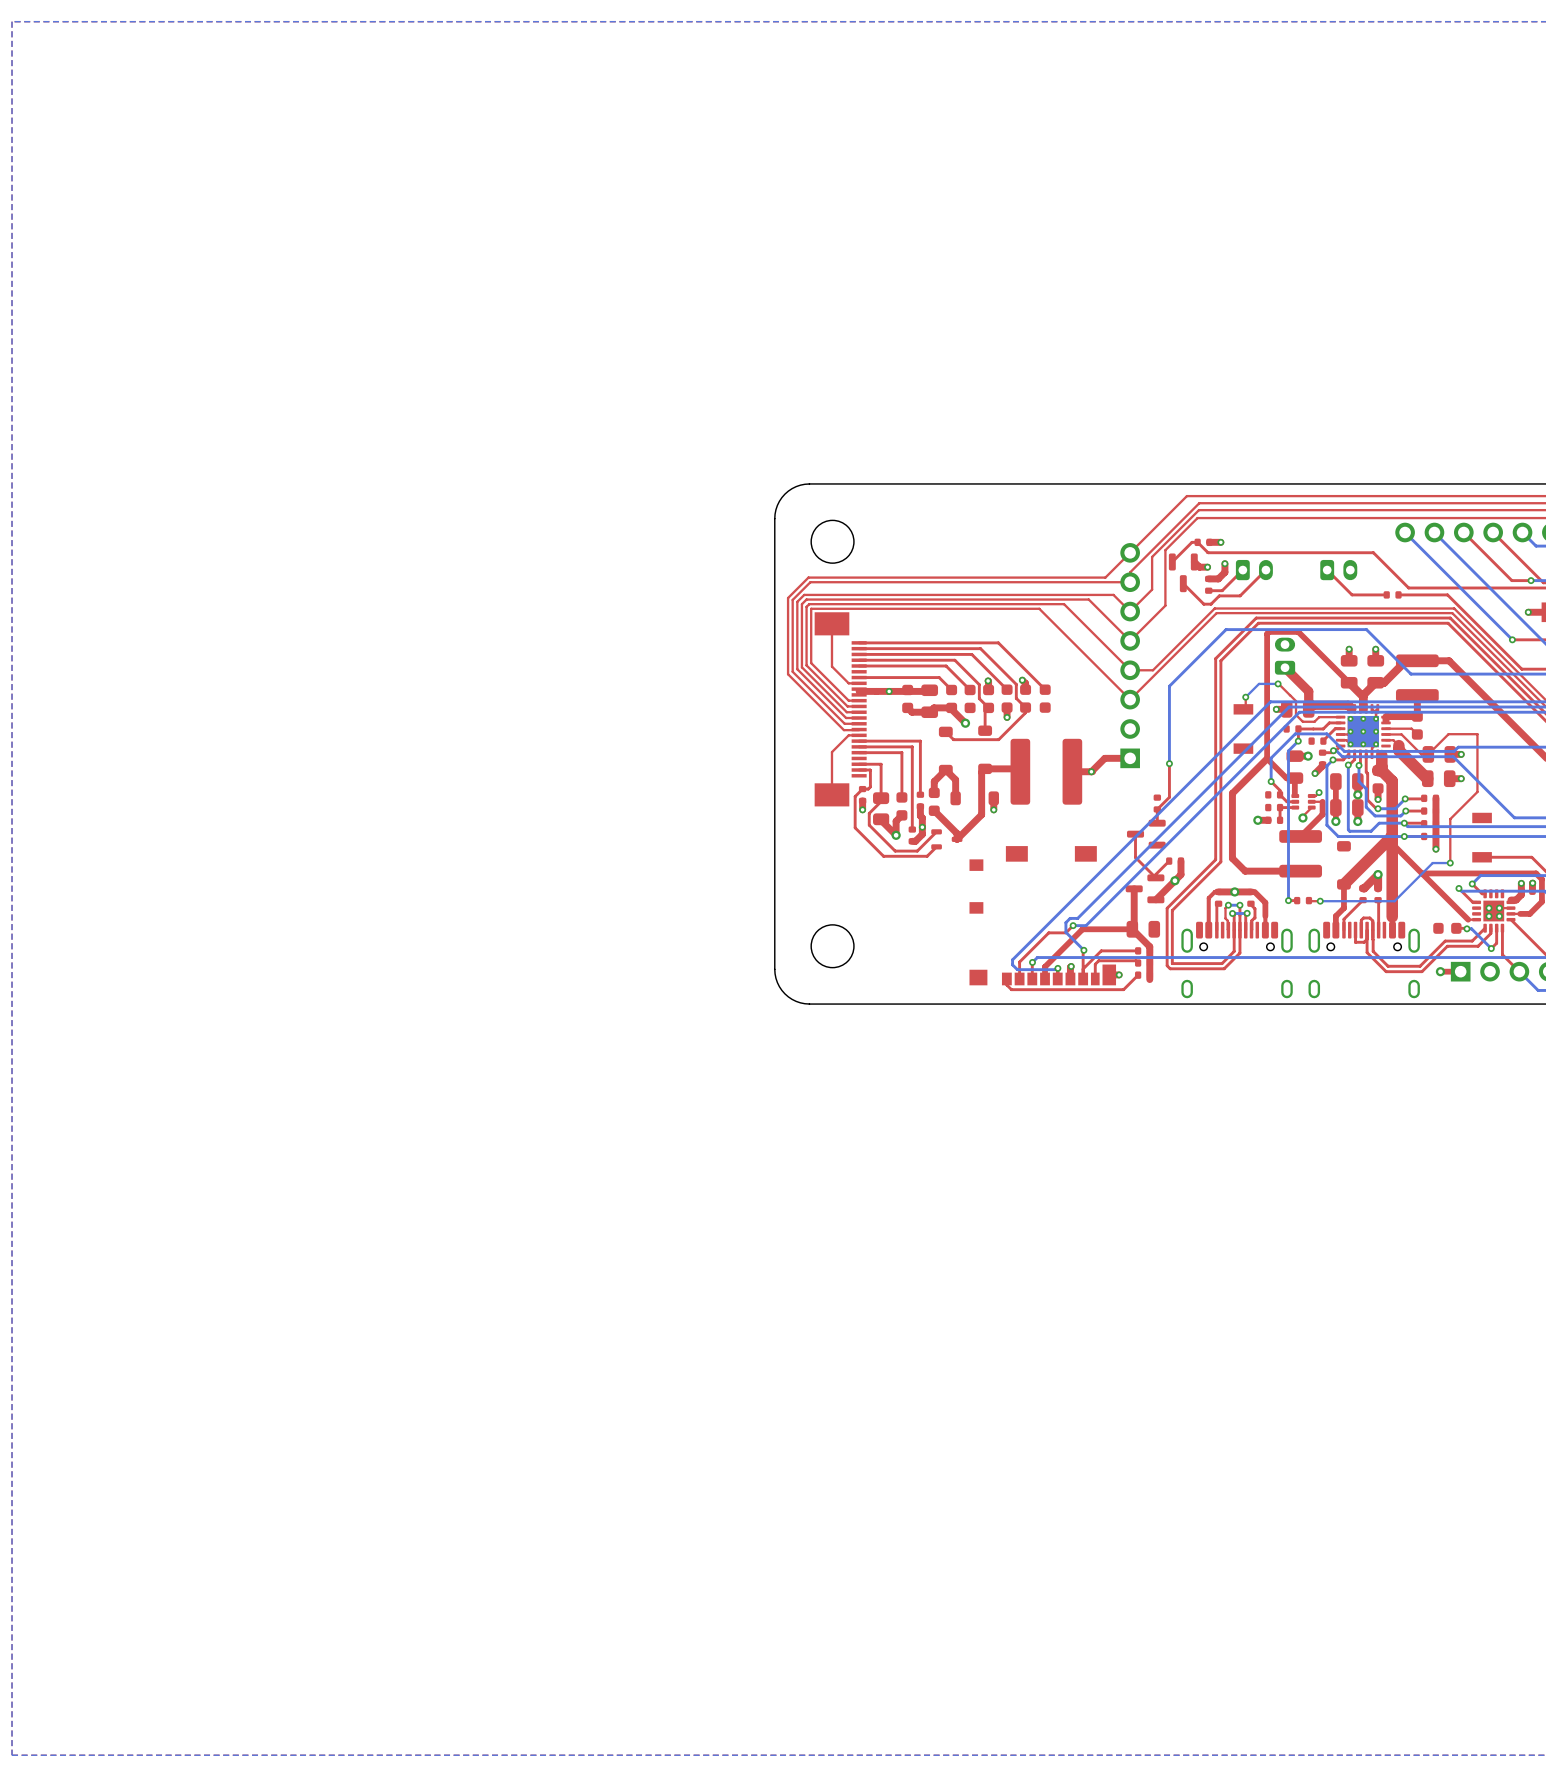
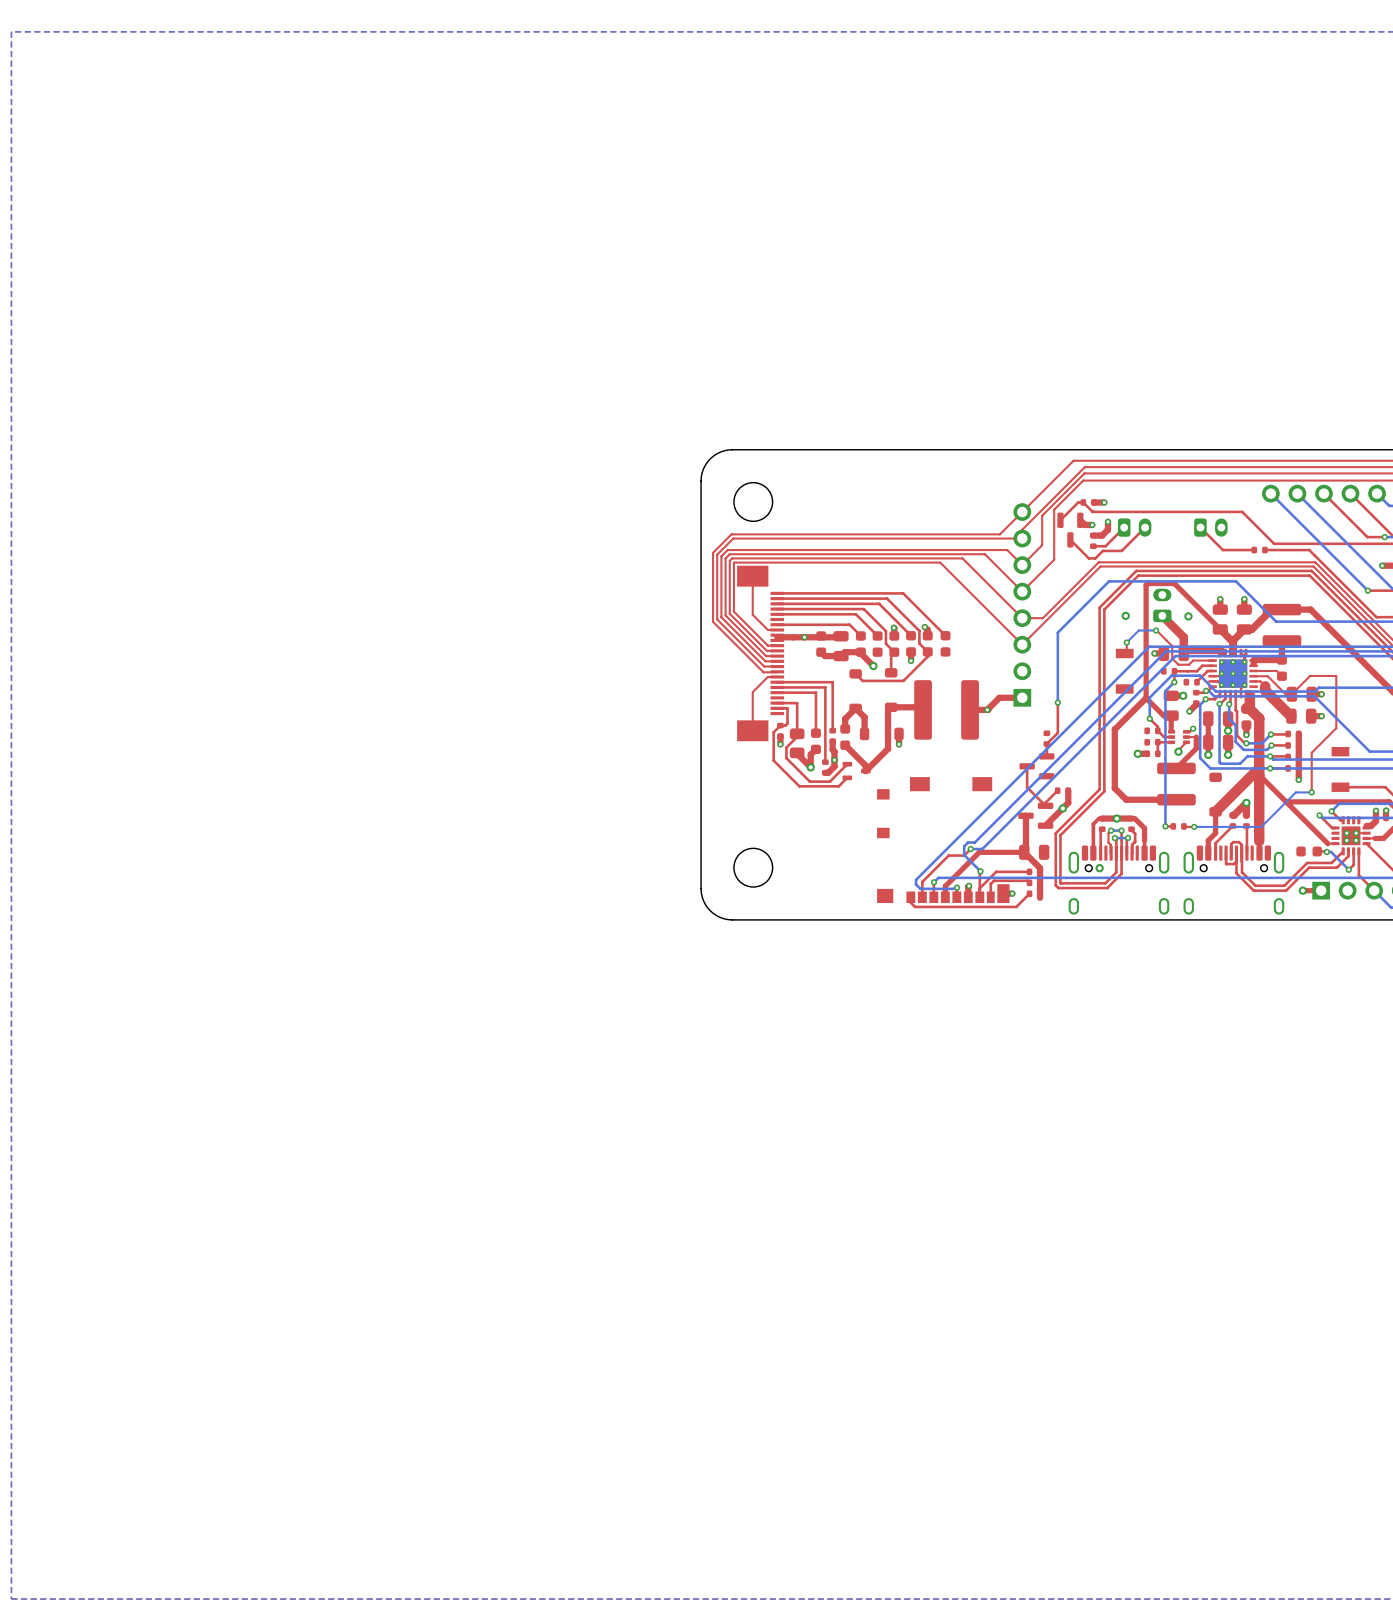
via: none -> (1125, 615)
via: none -> (1188, 616)
via: none -> (1099, 868)

